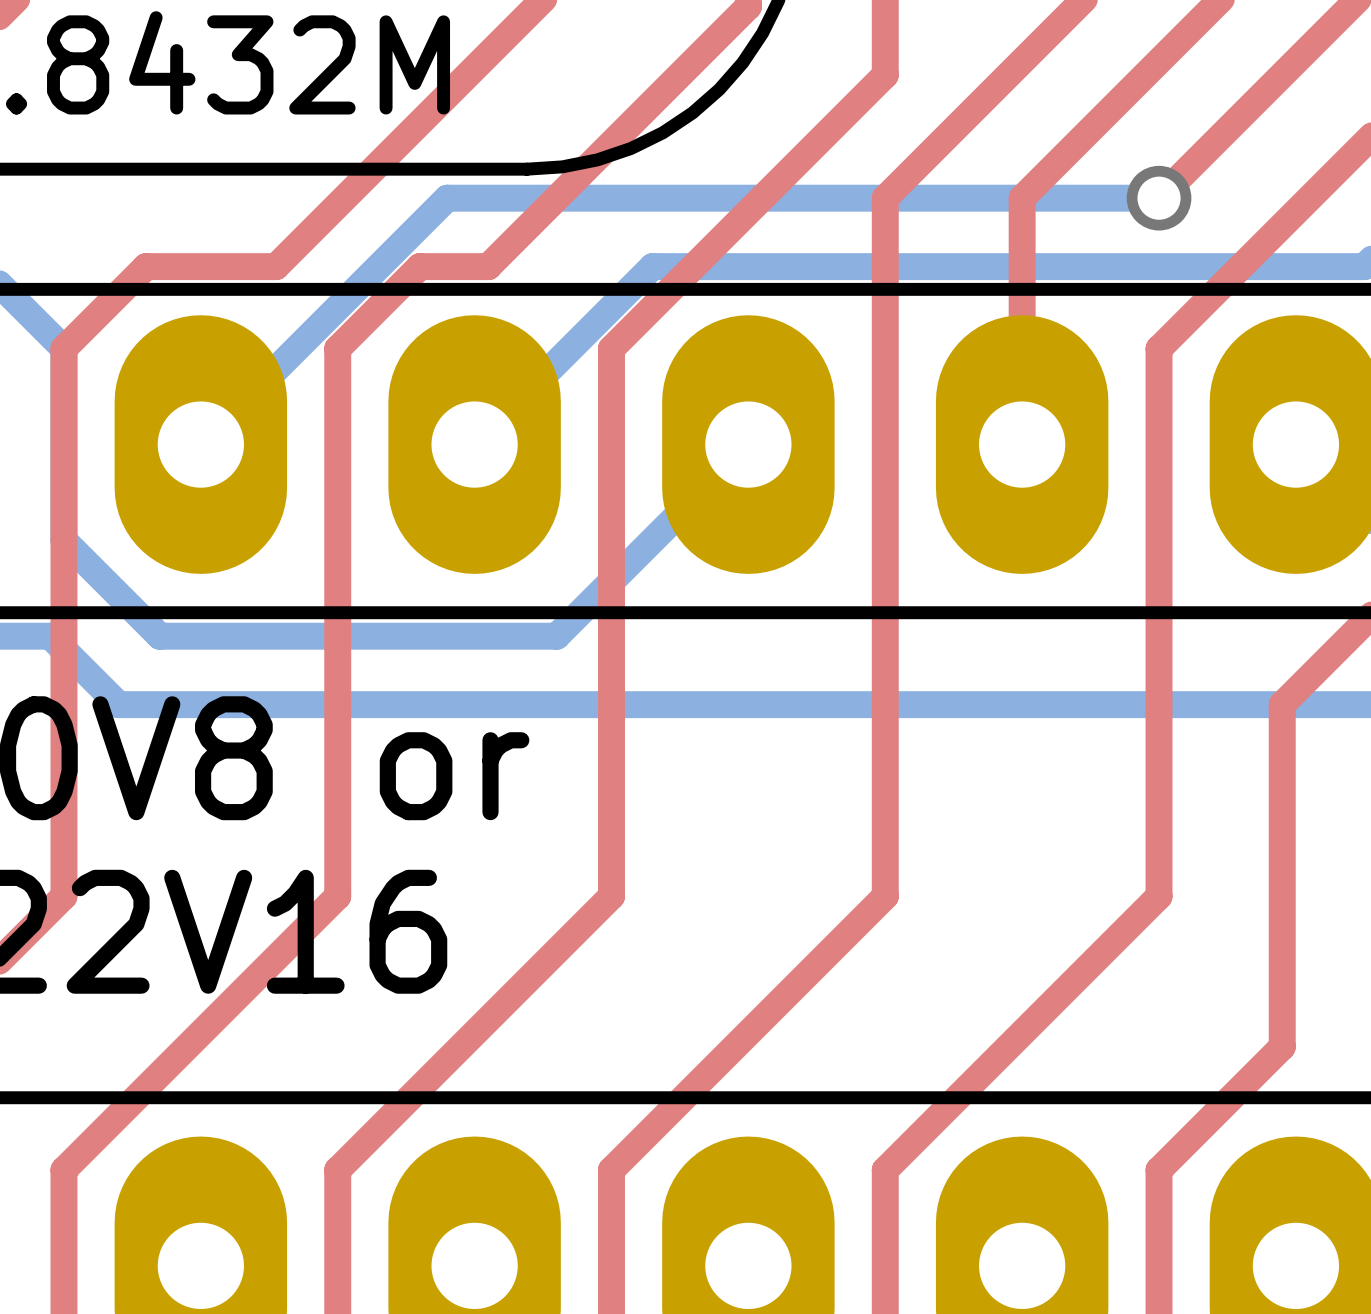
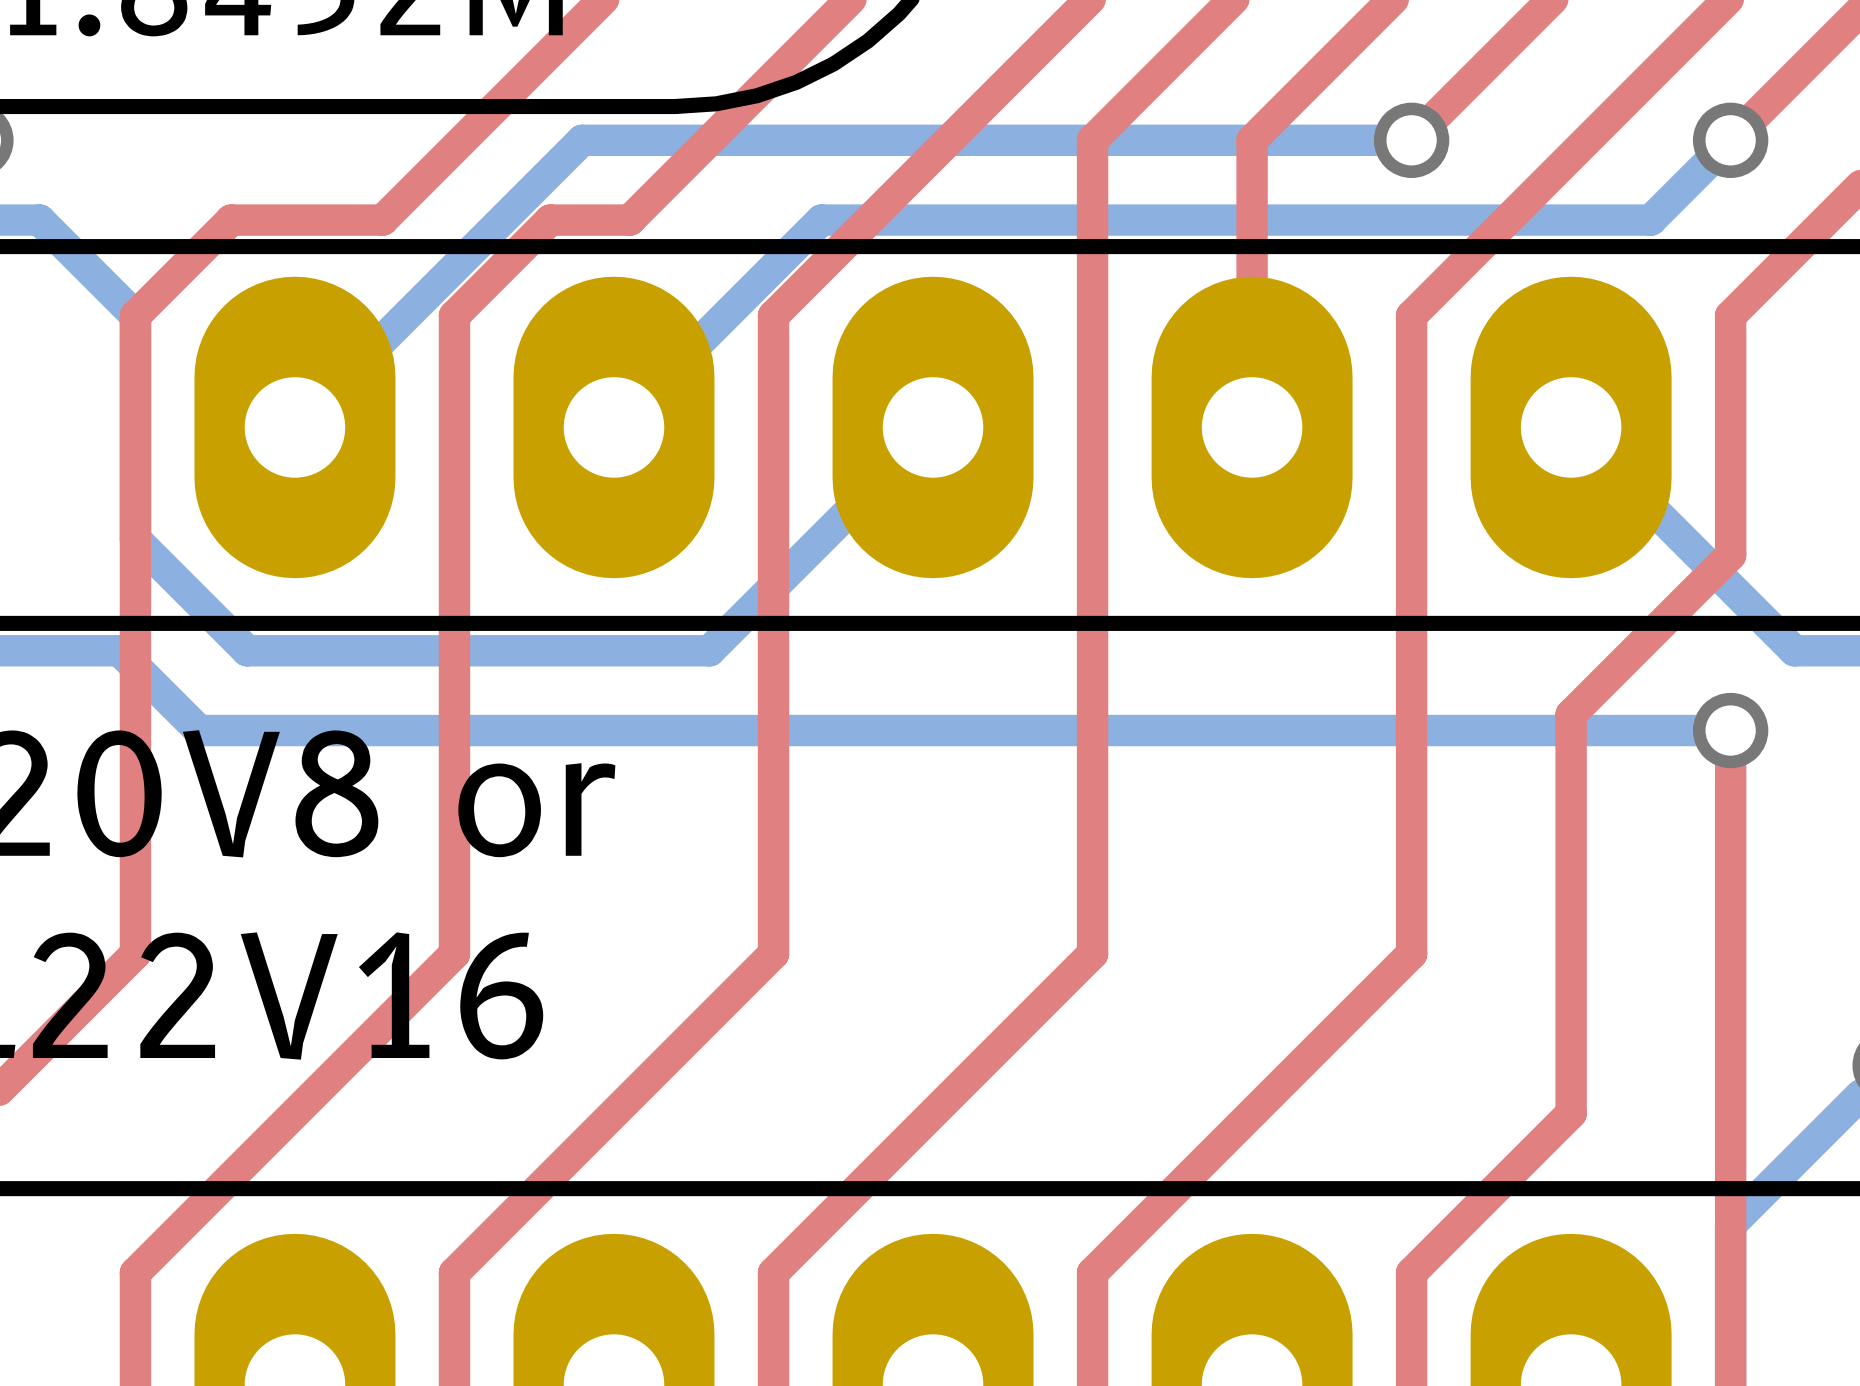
top track: (1295, 690) (1282, 704) (1282, 1046) -> (1571, 714) (1571, 1113) (1555, 1129)

